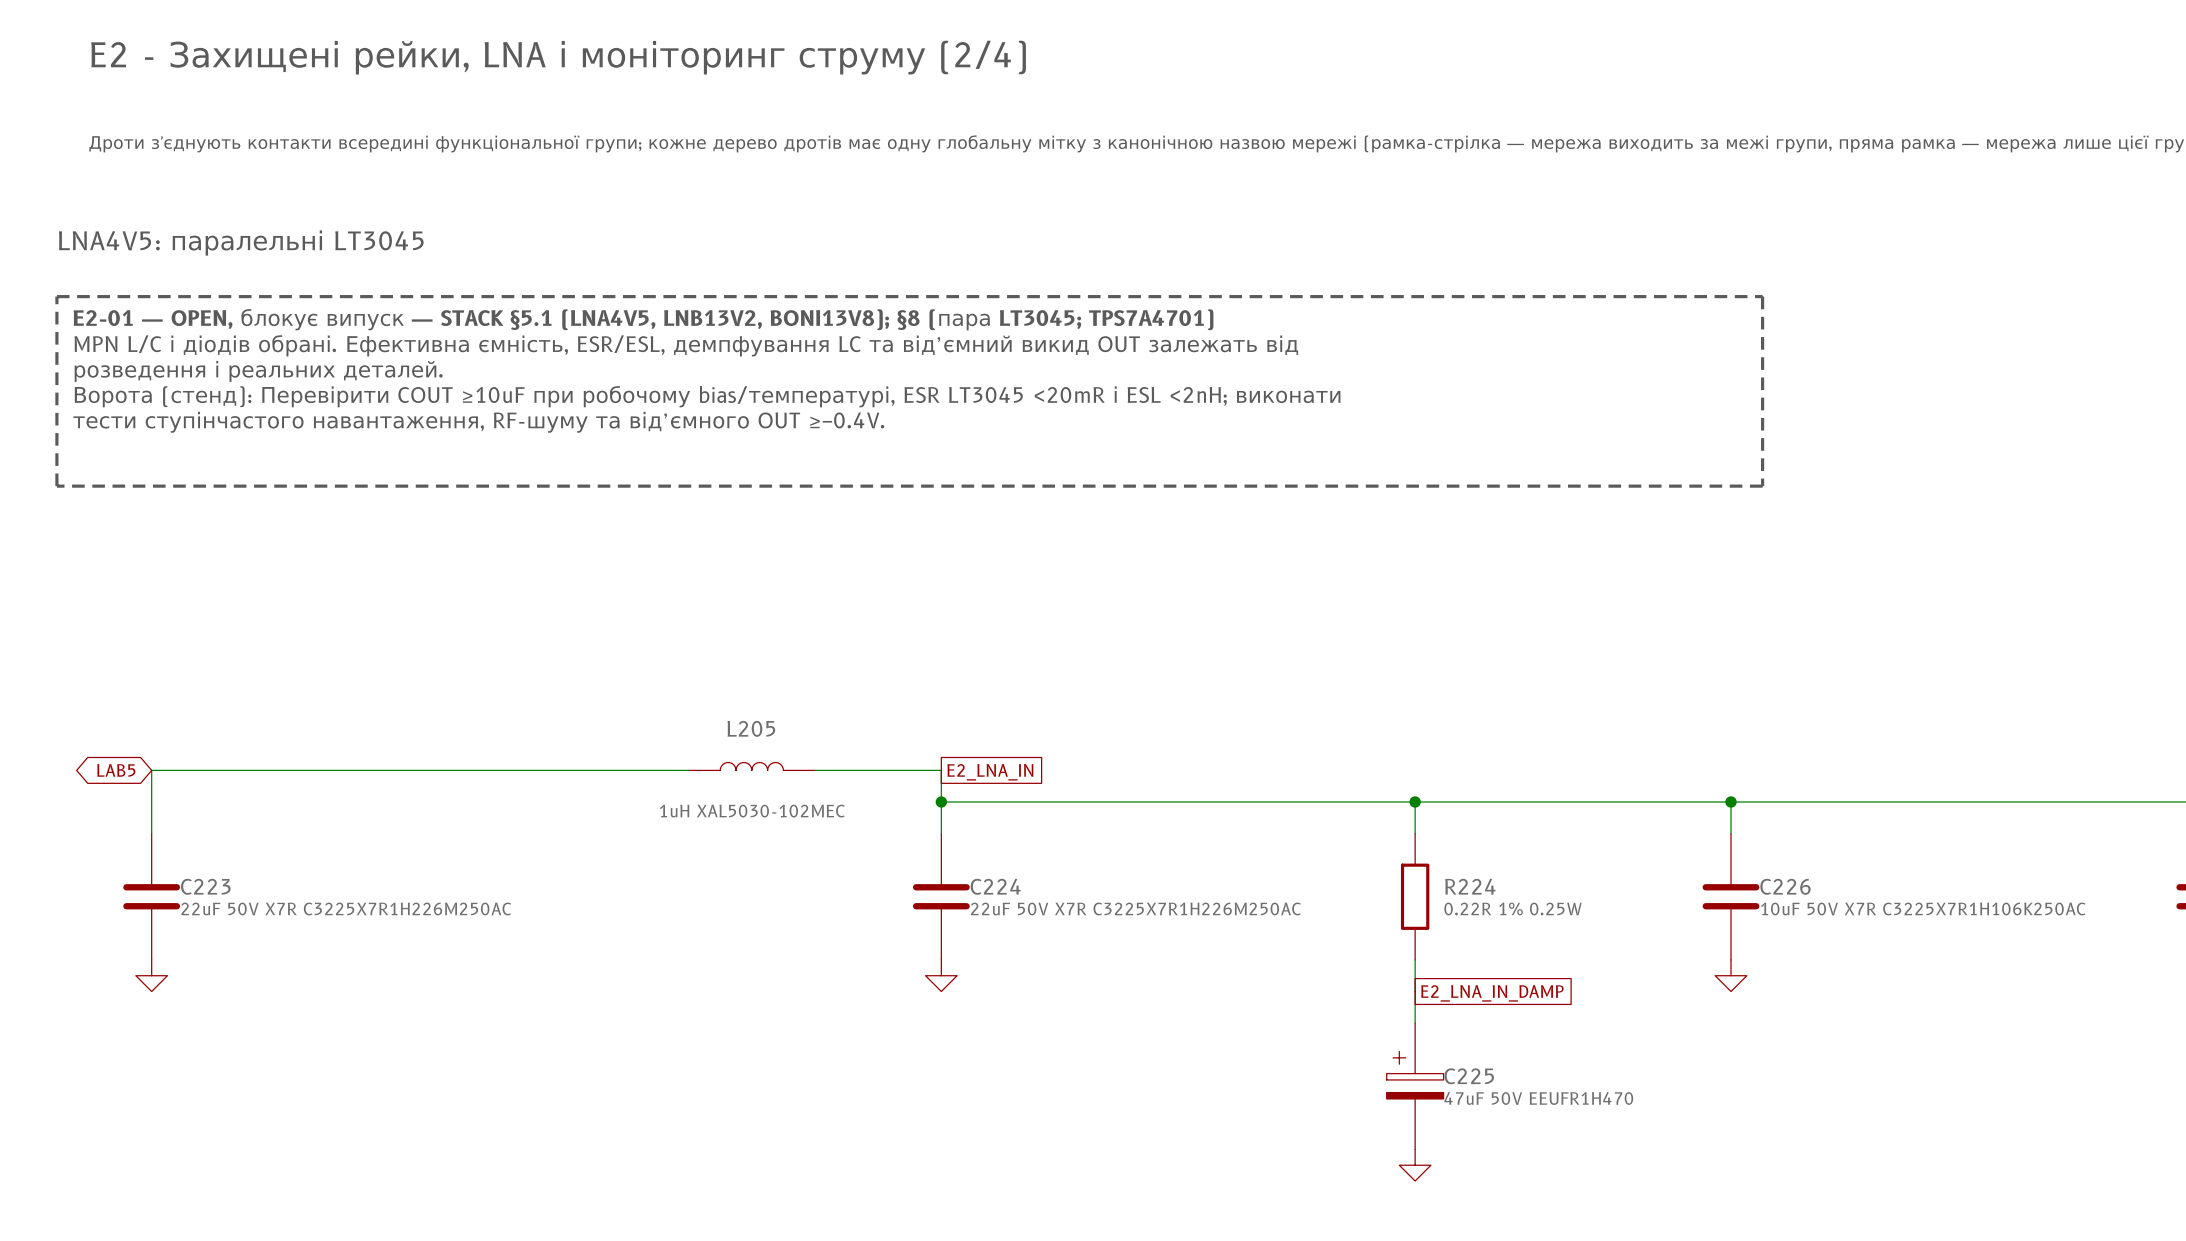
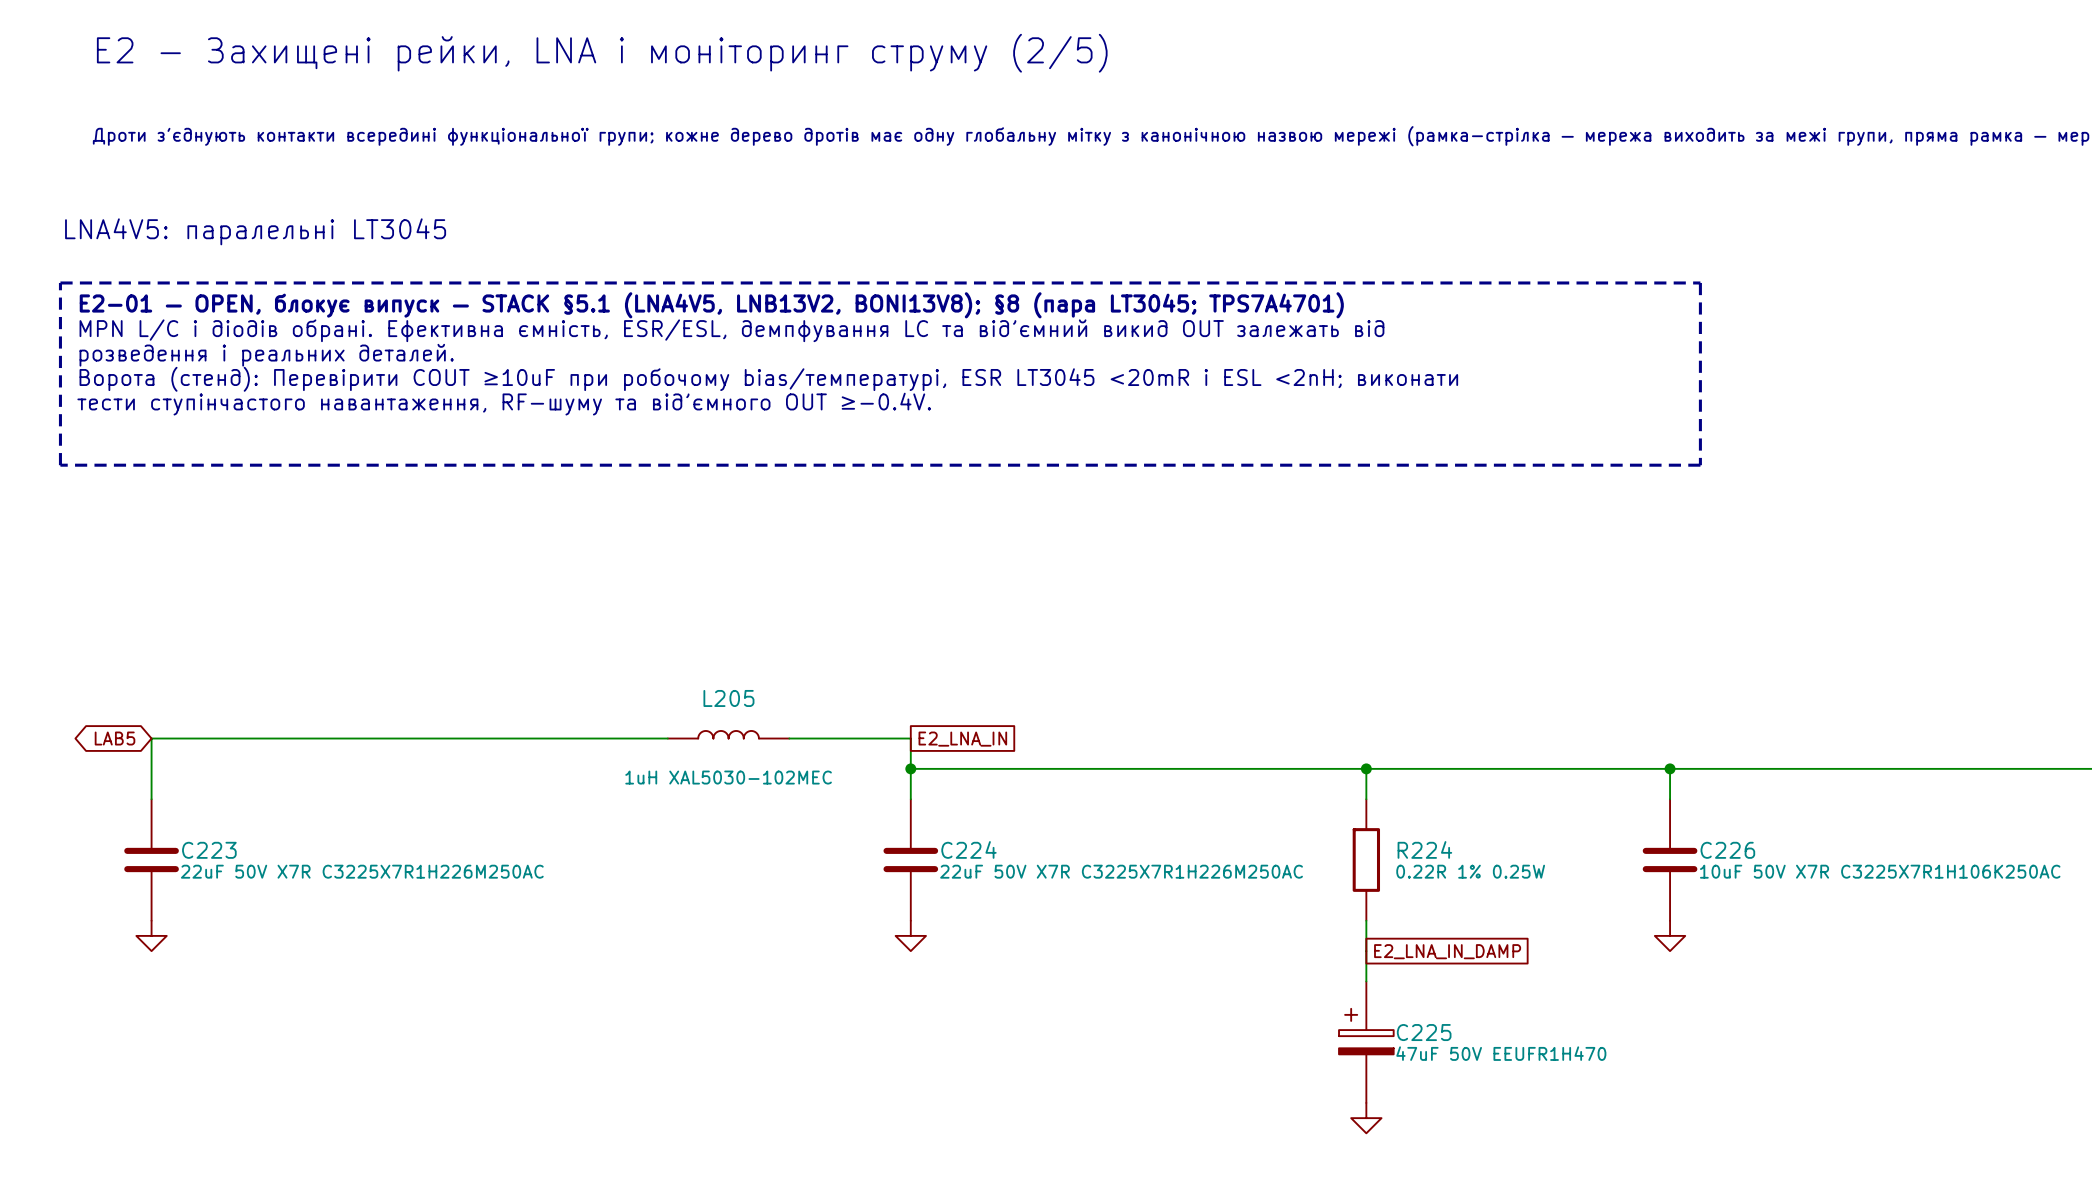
text: E2 - Захищені рейки, LNA і моніторинг струму (2/4) (558, 57) -> E2 - Захищені рейки, LNA і моніторинг струму (2/5) (602, 53)

